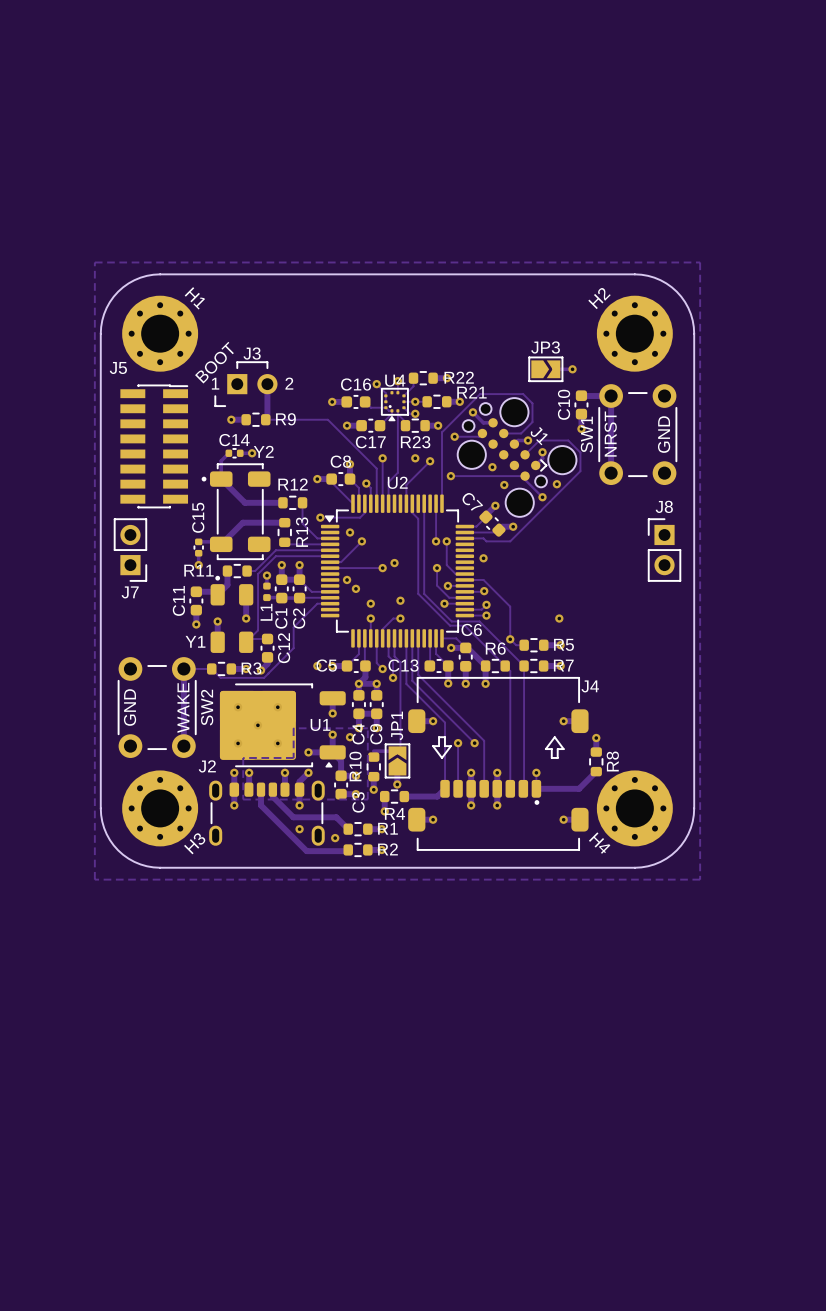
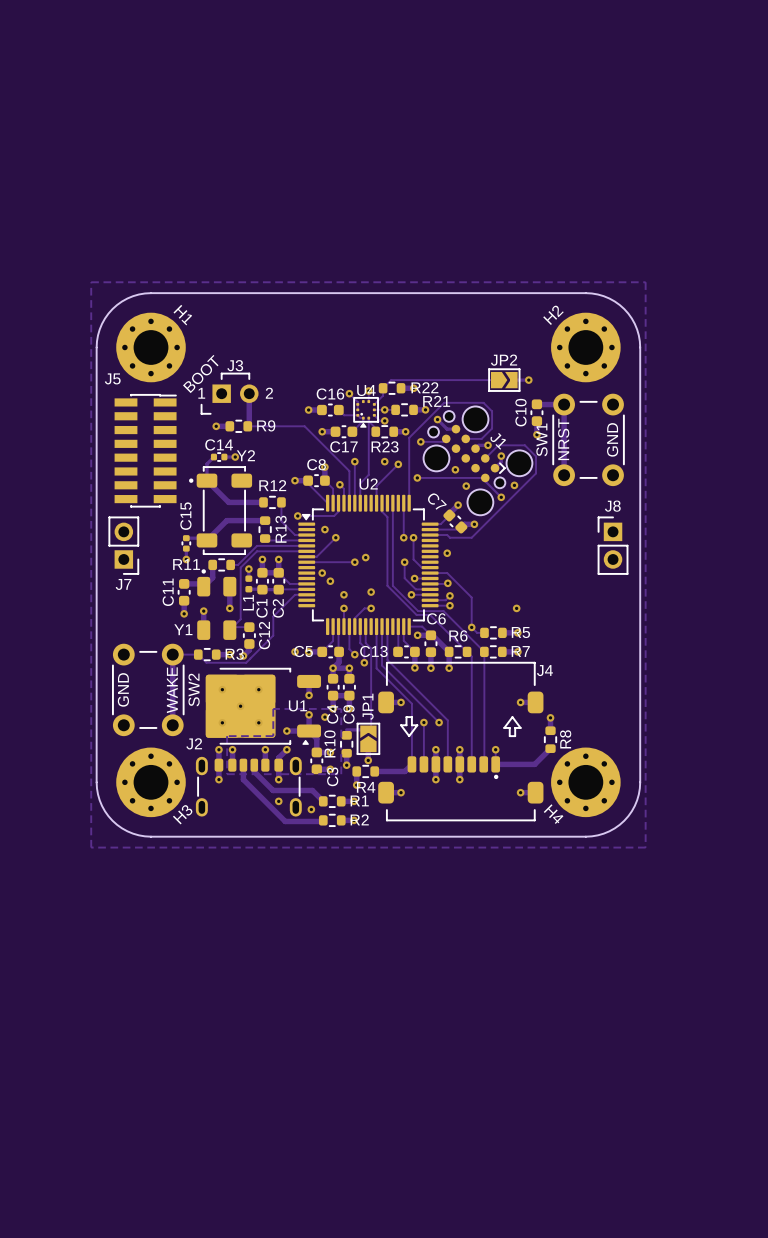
JP3 name: JP3 (545, 347) -> JP2 (504, 360)
track: none -> (496, 380) (391, 380) (383, 388)

